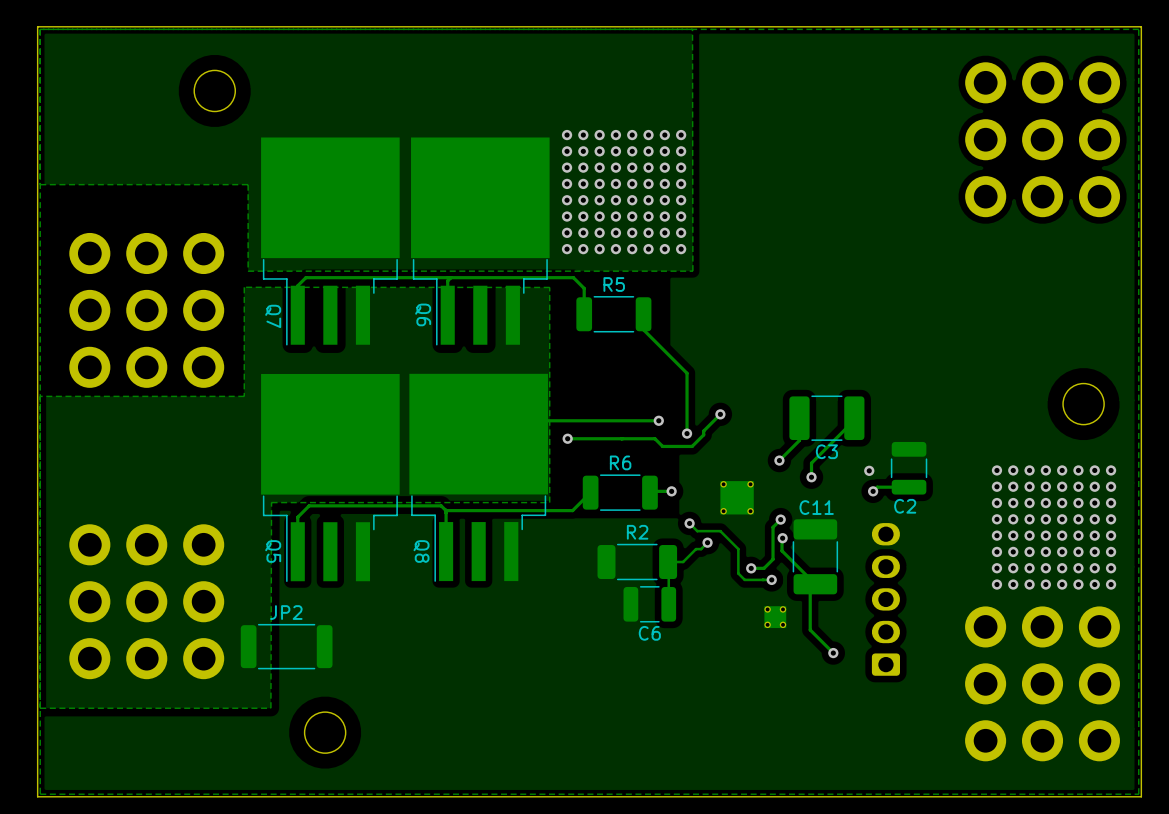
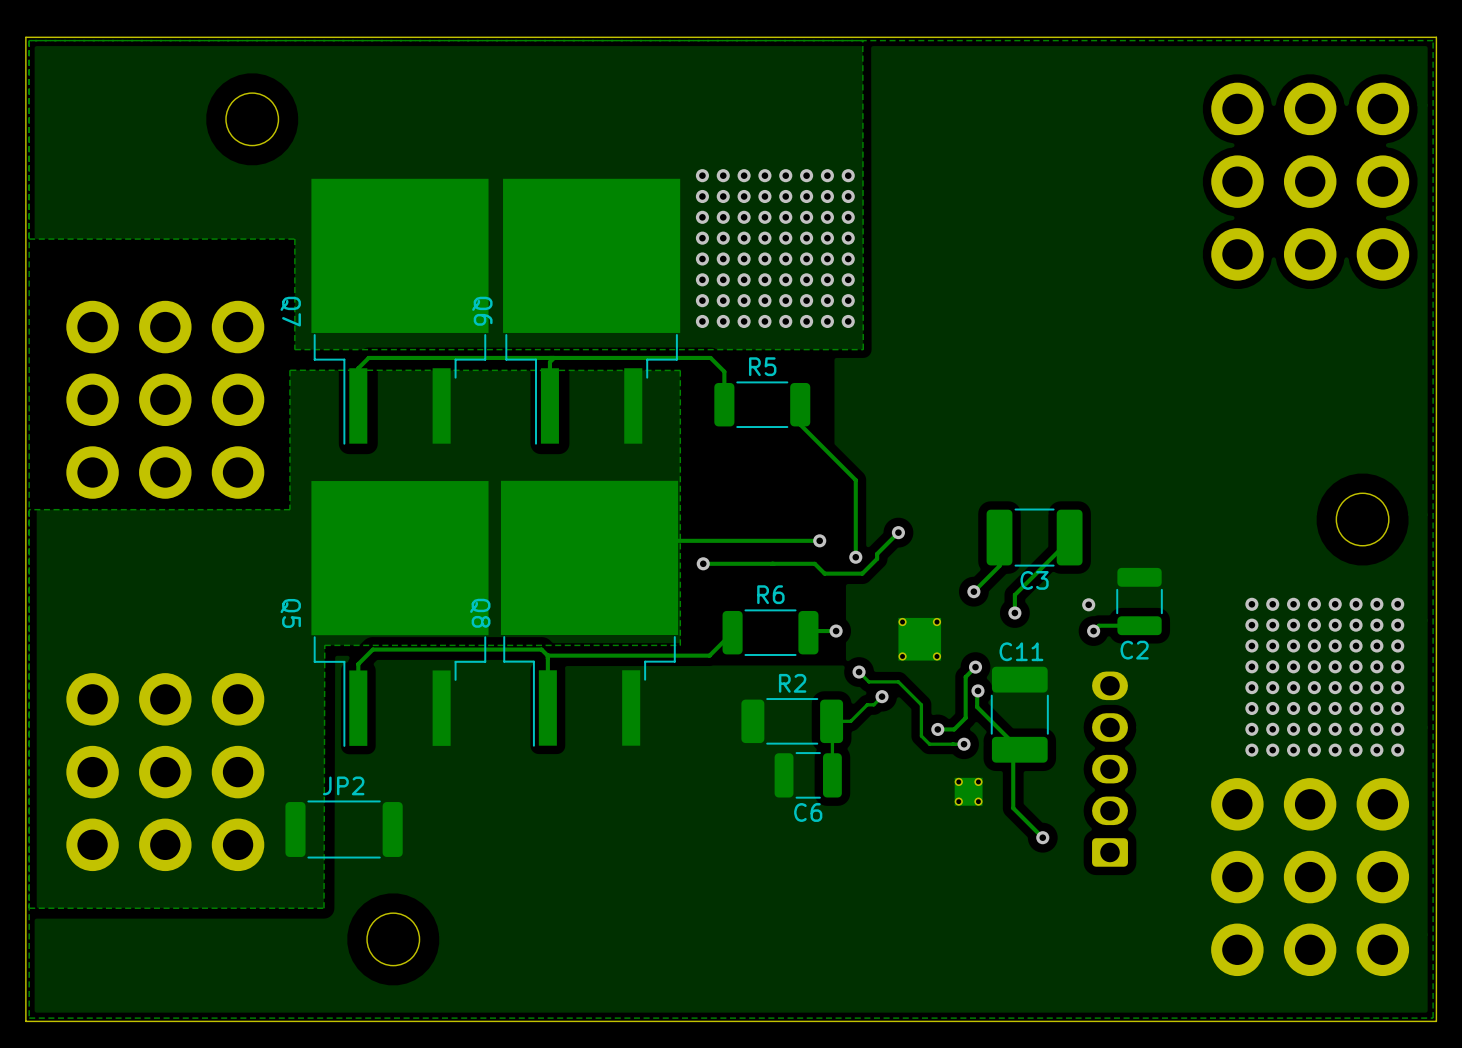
Q7 footprint: [261, 137, 400, 346] -> [311, 178, 489, 445]
Q6 footprint: [411, 137, 550, 346] -> [503, 178, 681, 445]
Q6 name position: Q6 (423, 314) -> Q6 (482, 311)
Q7 name position: Q7 (273, 316) -> Q7 (290, 311)
Q5 footprint: [261, 373, 400, 583] -> [311, 481, 489, 747]
Q8 footprint: [409, 373, 548, 582] -> [500, 480, 679, 747]
Q5 name position: Q5 (273, 551) -> Q5 (290, 613)
Q8 name position: Q8 (421, 551) -> Q8 (480, 613)

